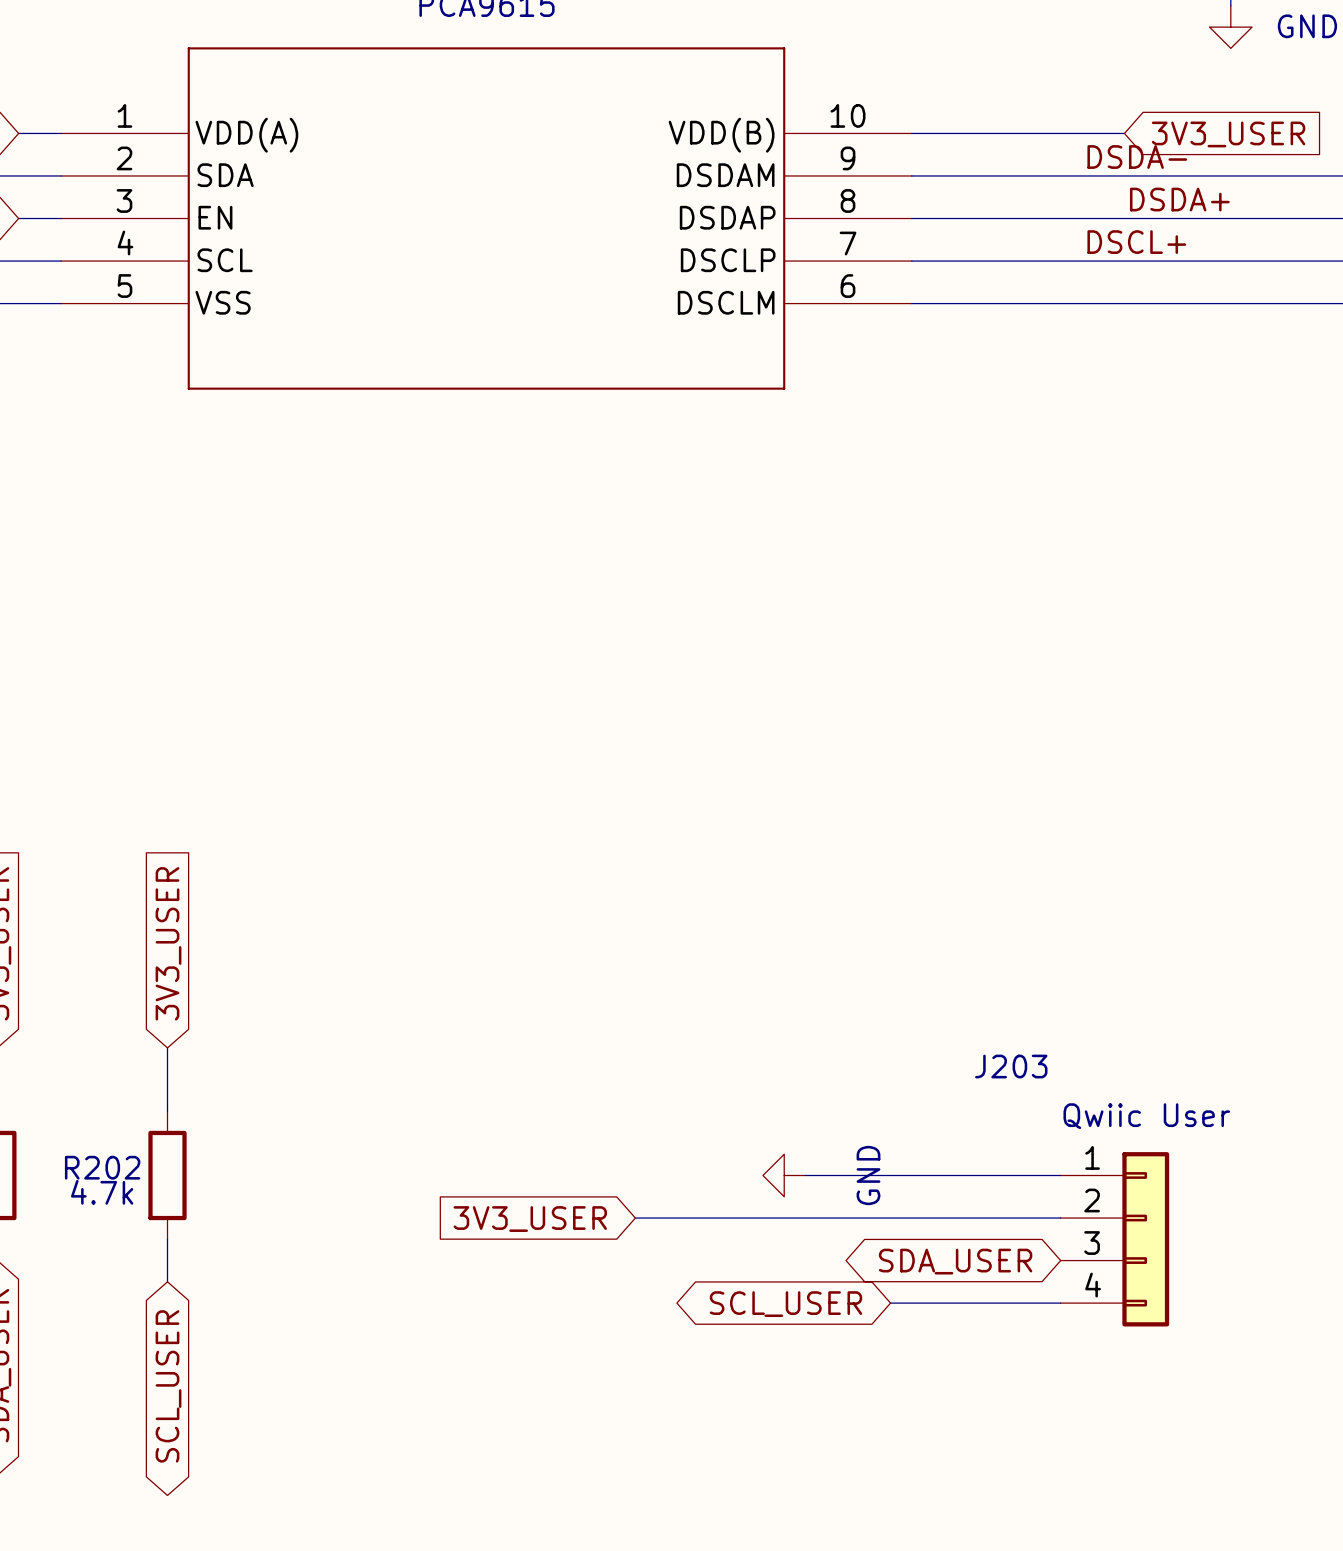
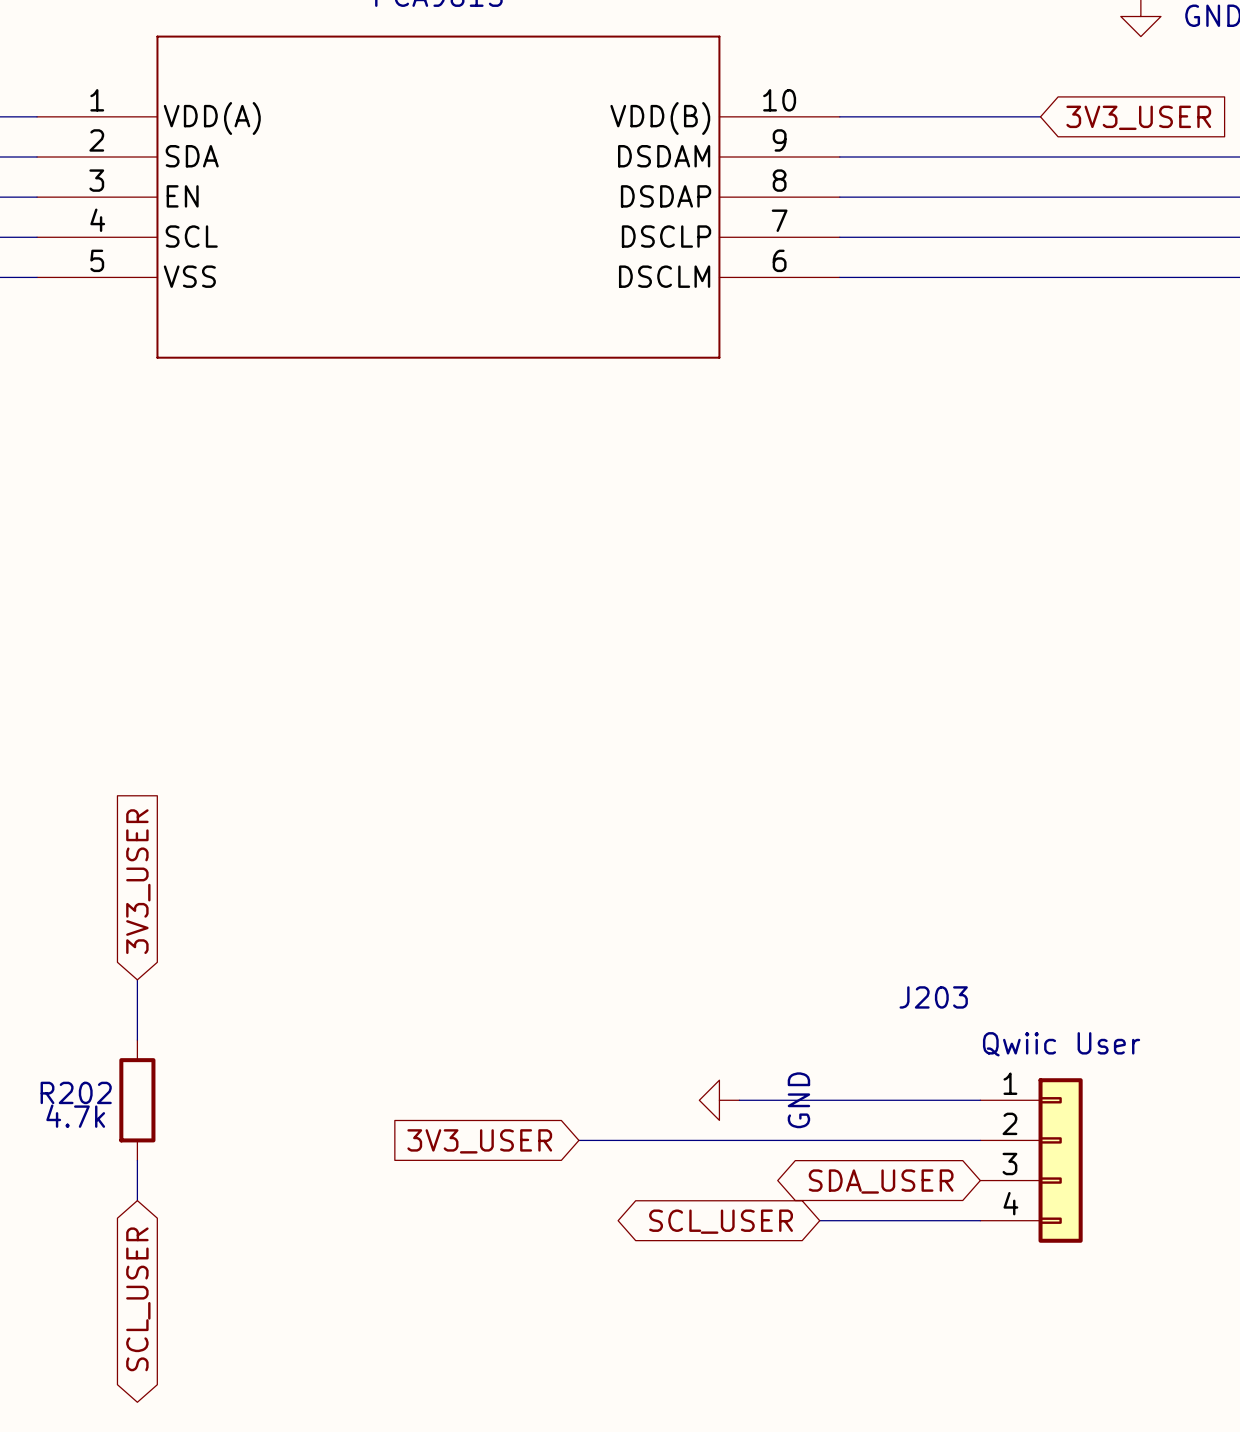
label: DSDA- (1137, 157) -> none
label: DSDA+ (1179, 199) -> none
label: DSCL+ (1136, 242) -> none

